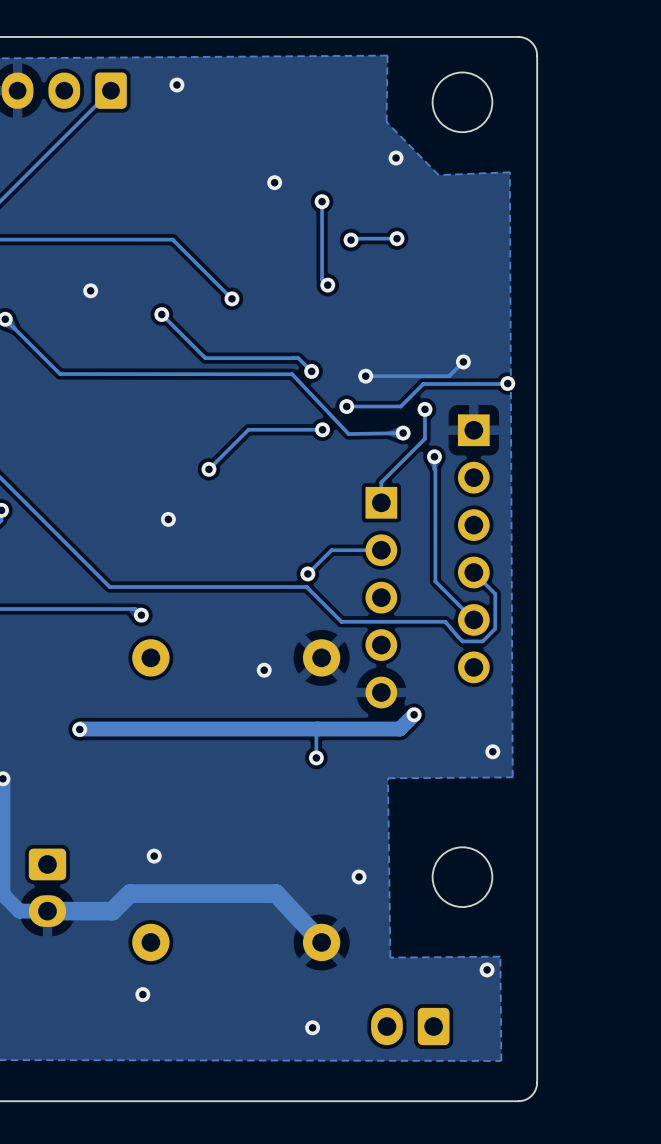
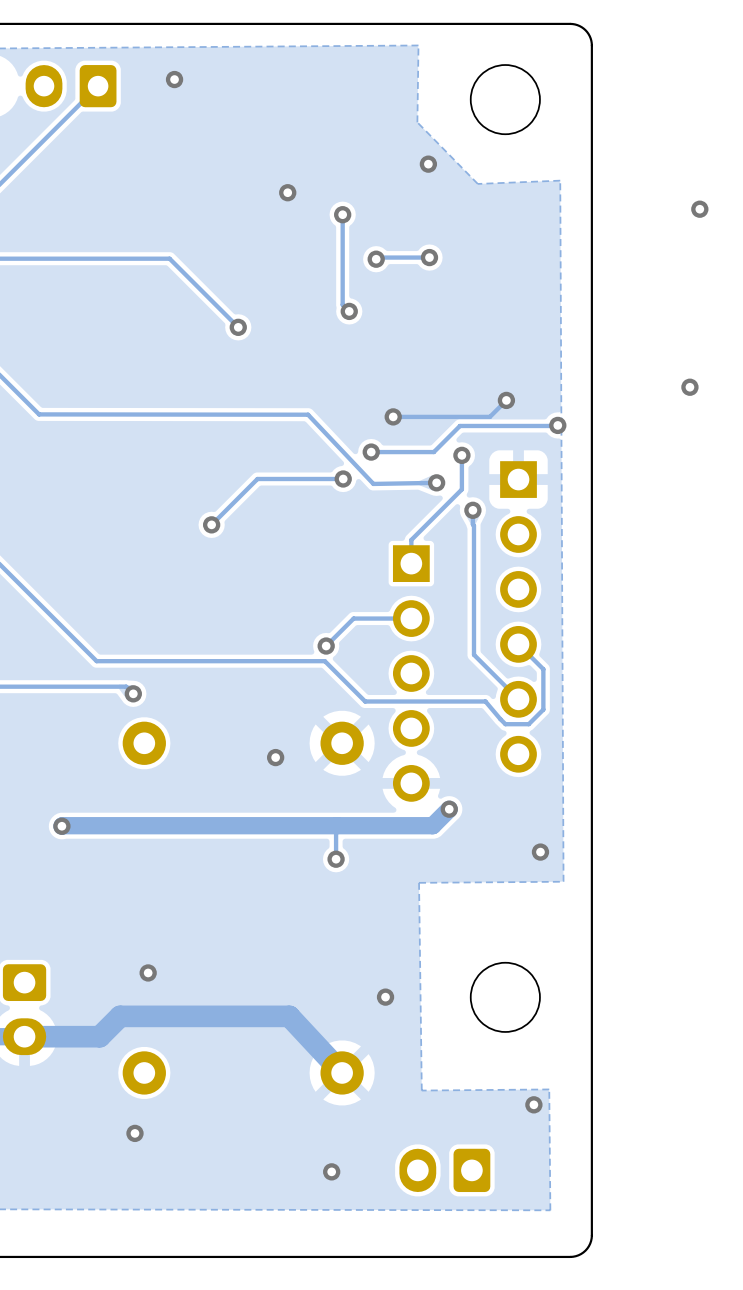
via: none -> (699, 209)
via: (90, 290) -> none
track: (161, 314) (205, 358) (298, 358) (311, 371) -> none
via: (161, 314) -> none
via: none -> (689, 387)
via: (311, 371) -> none
via: (168, 519) -> none

